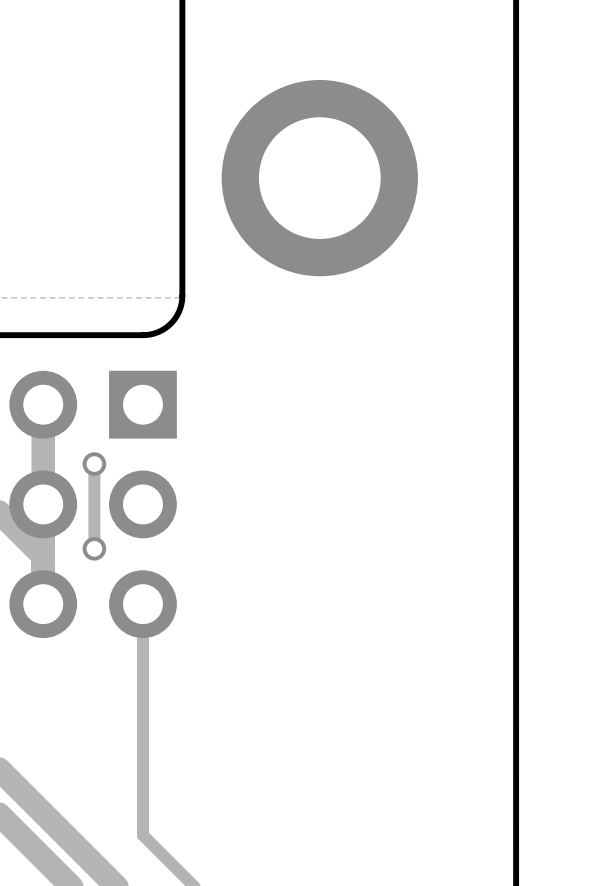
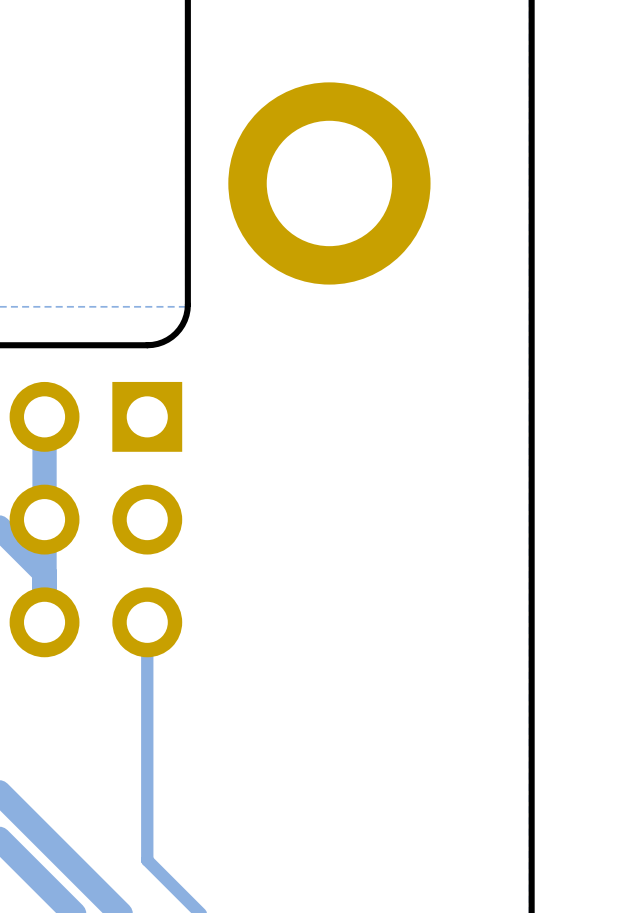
track: (94, 464) (94, 548) -> none
via: (94, 464) -> none
via: (94, 548) -> none

